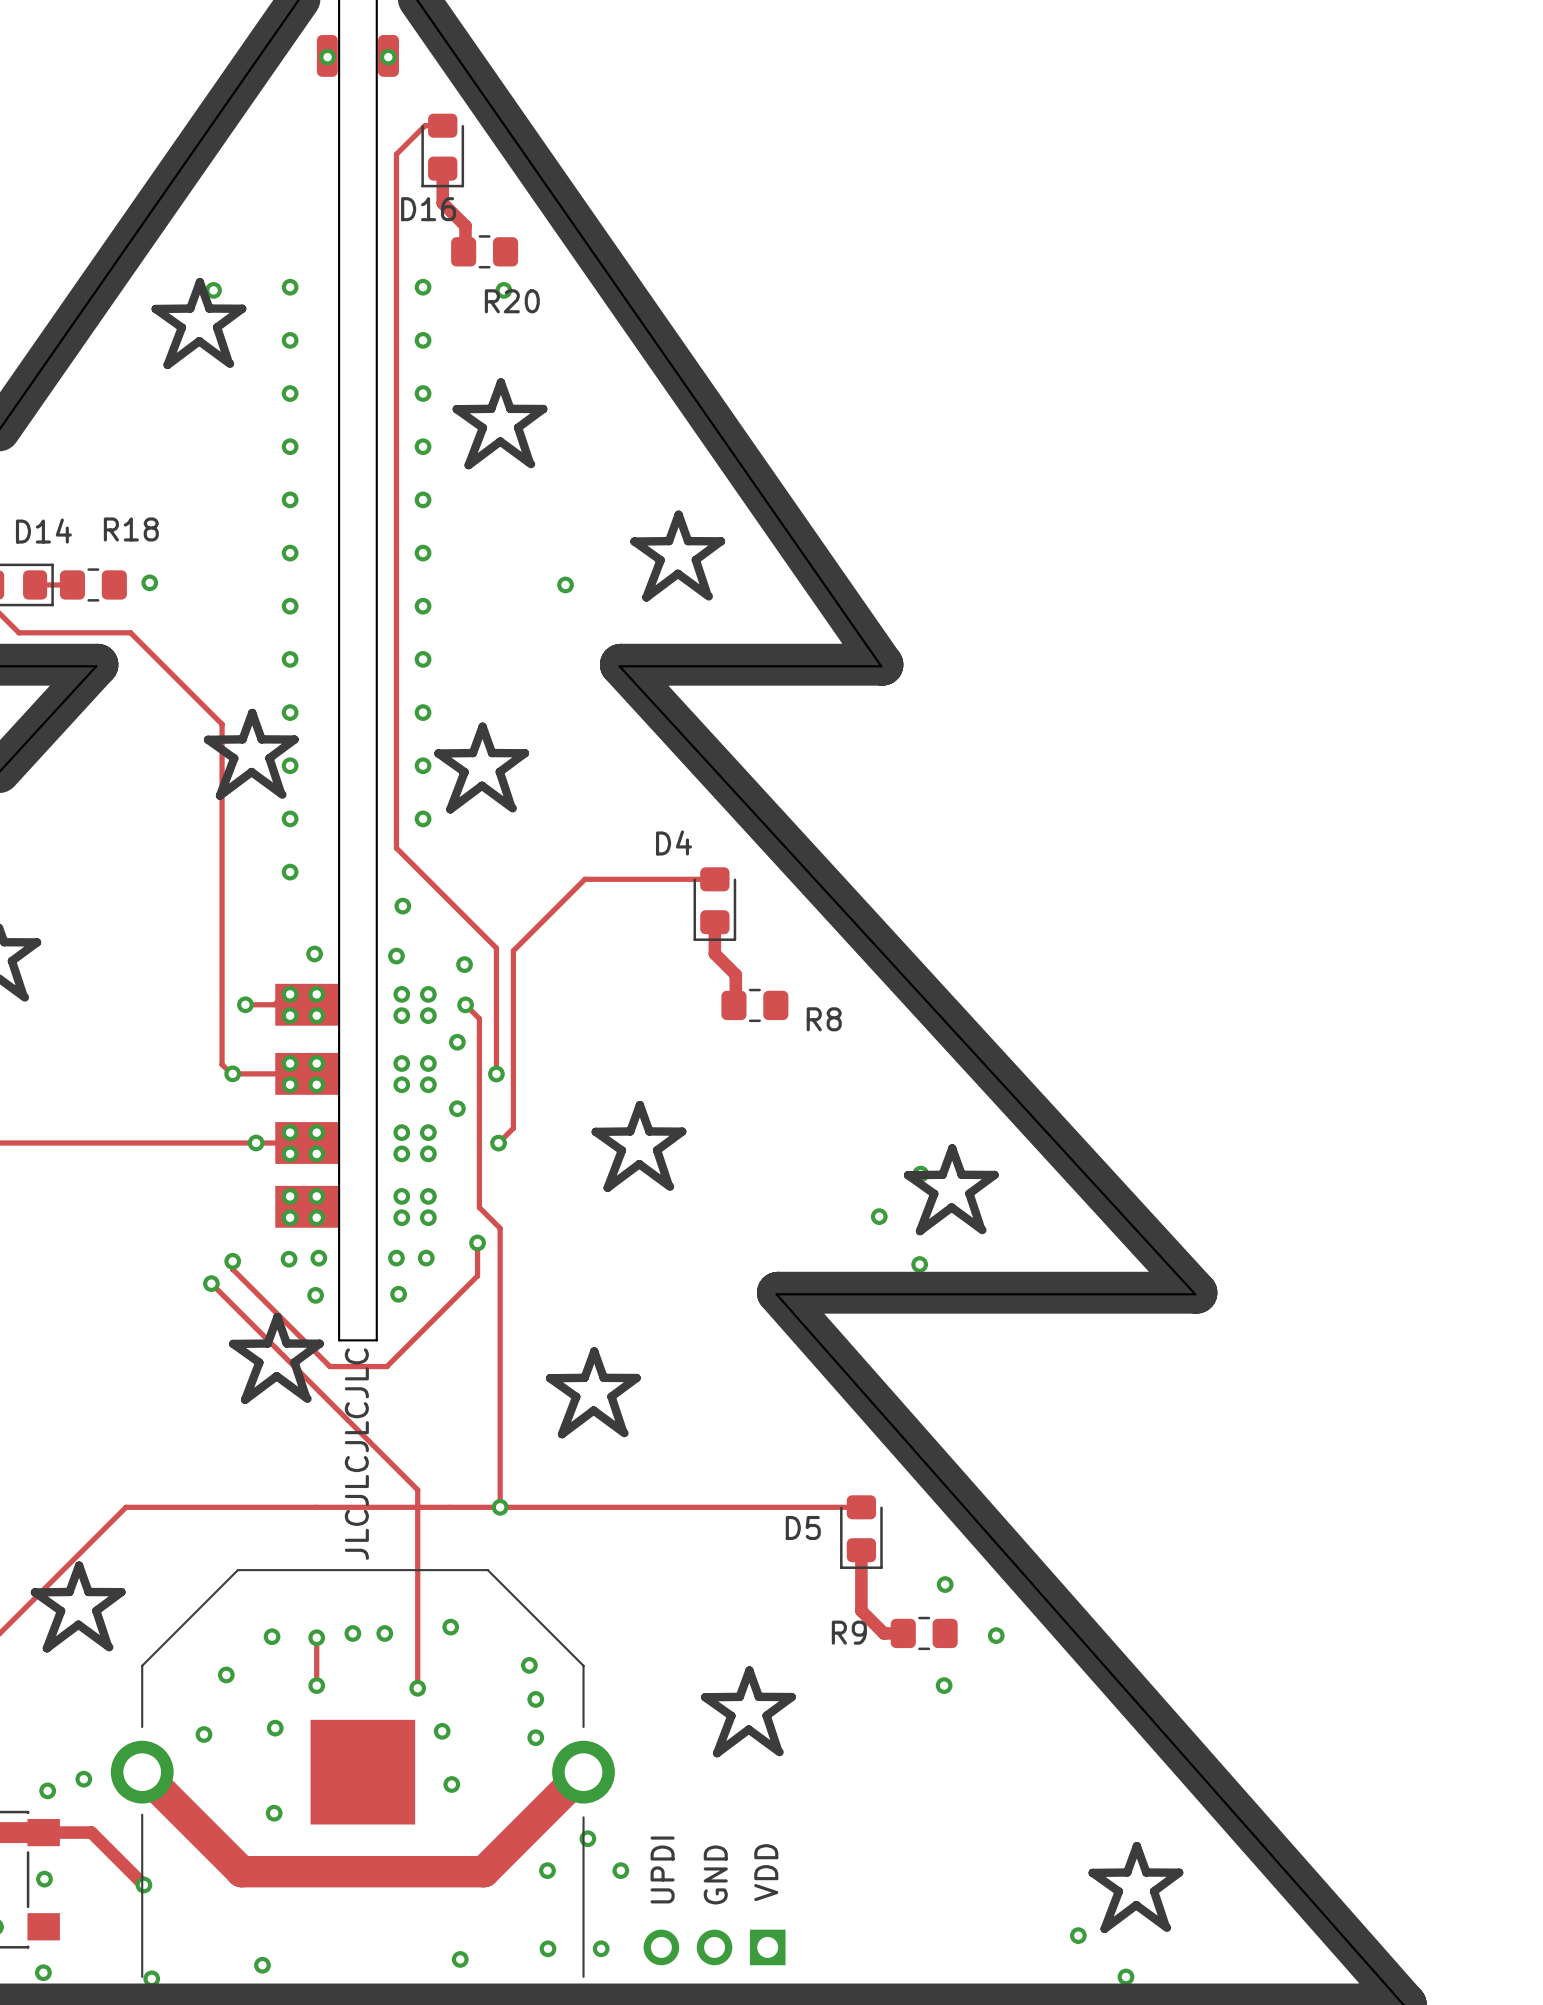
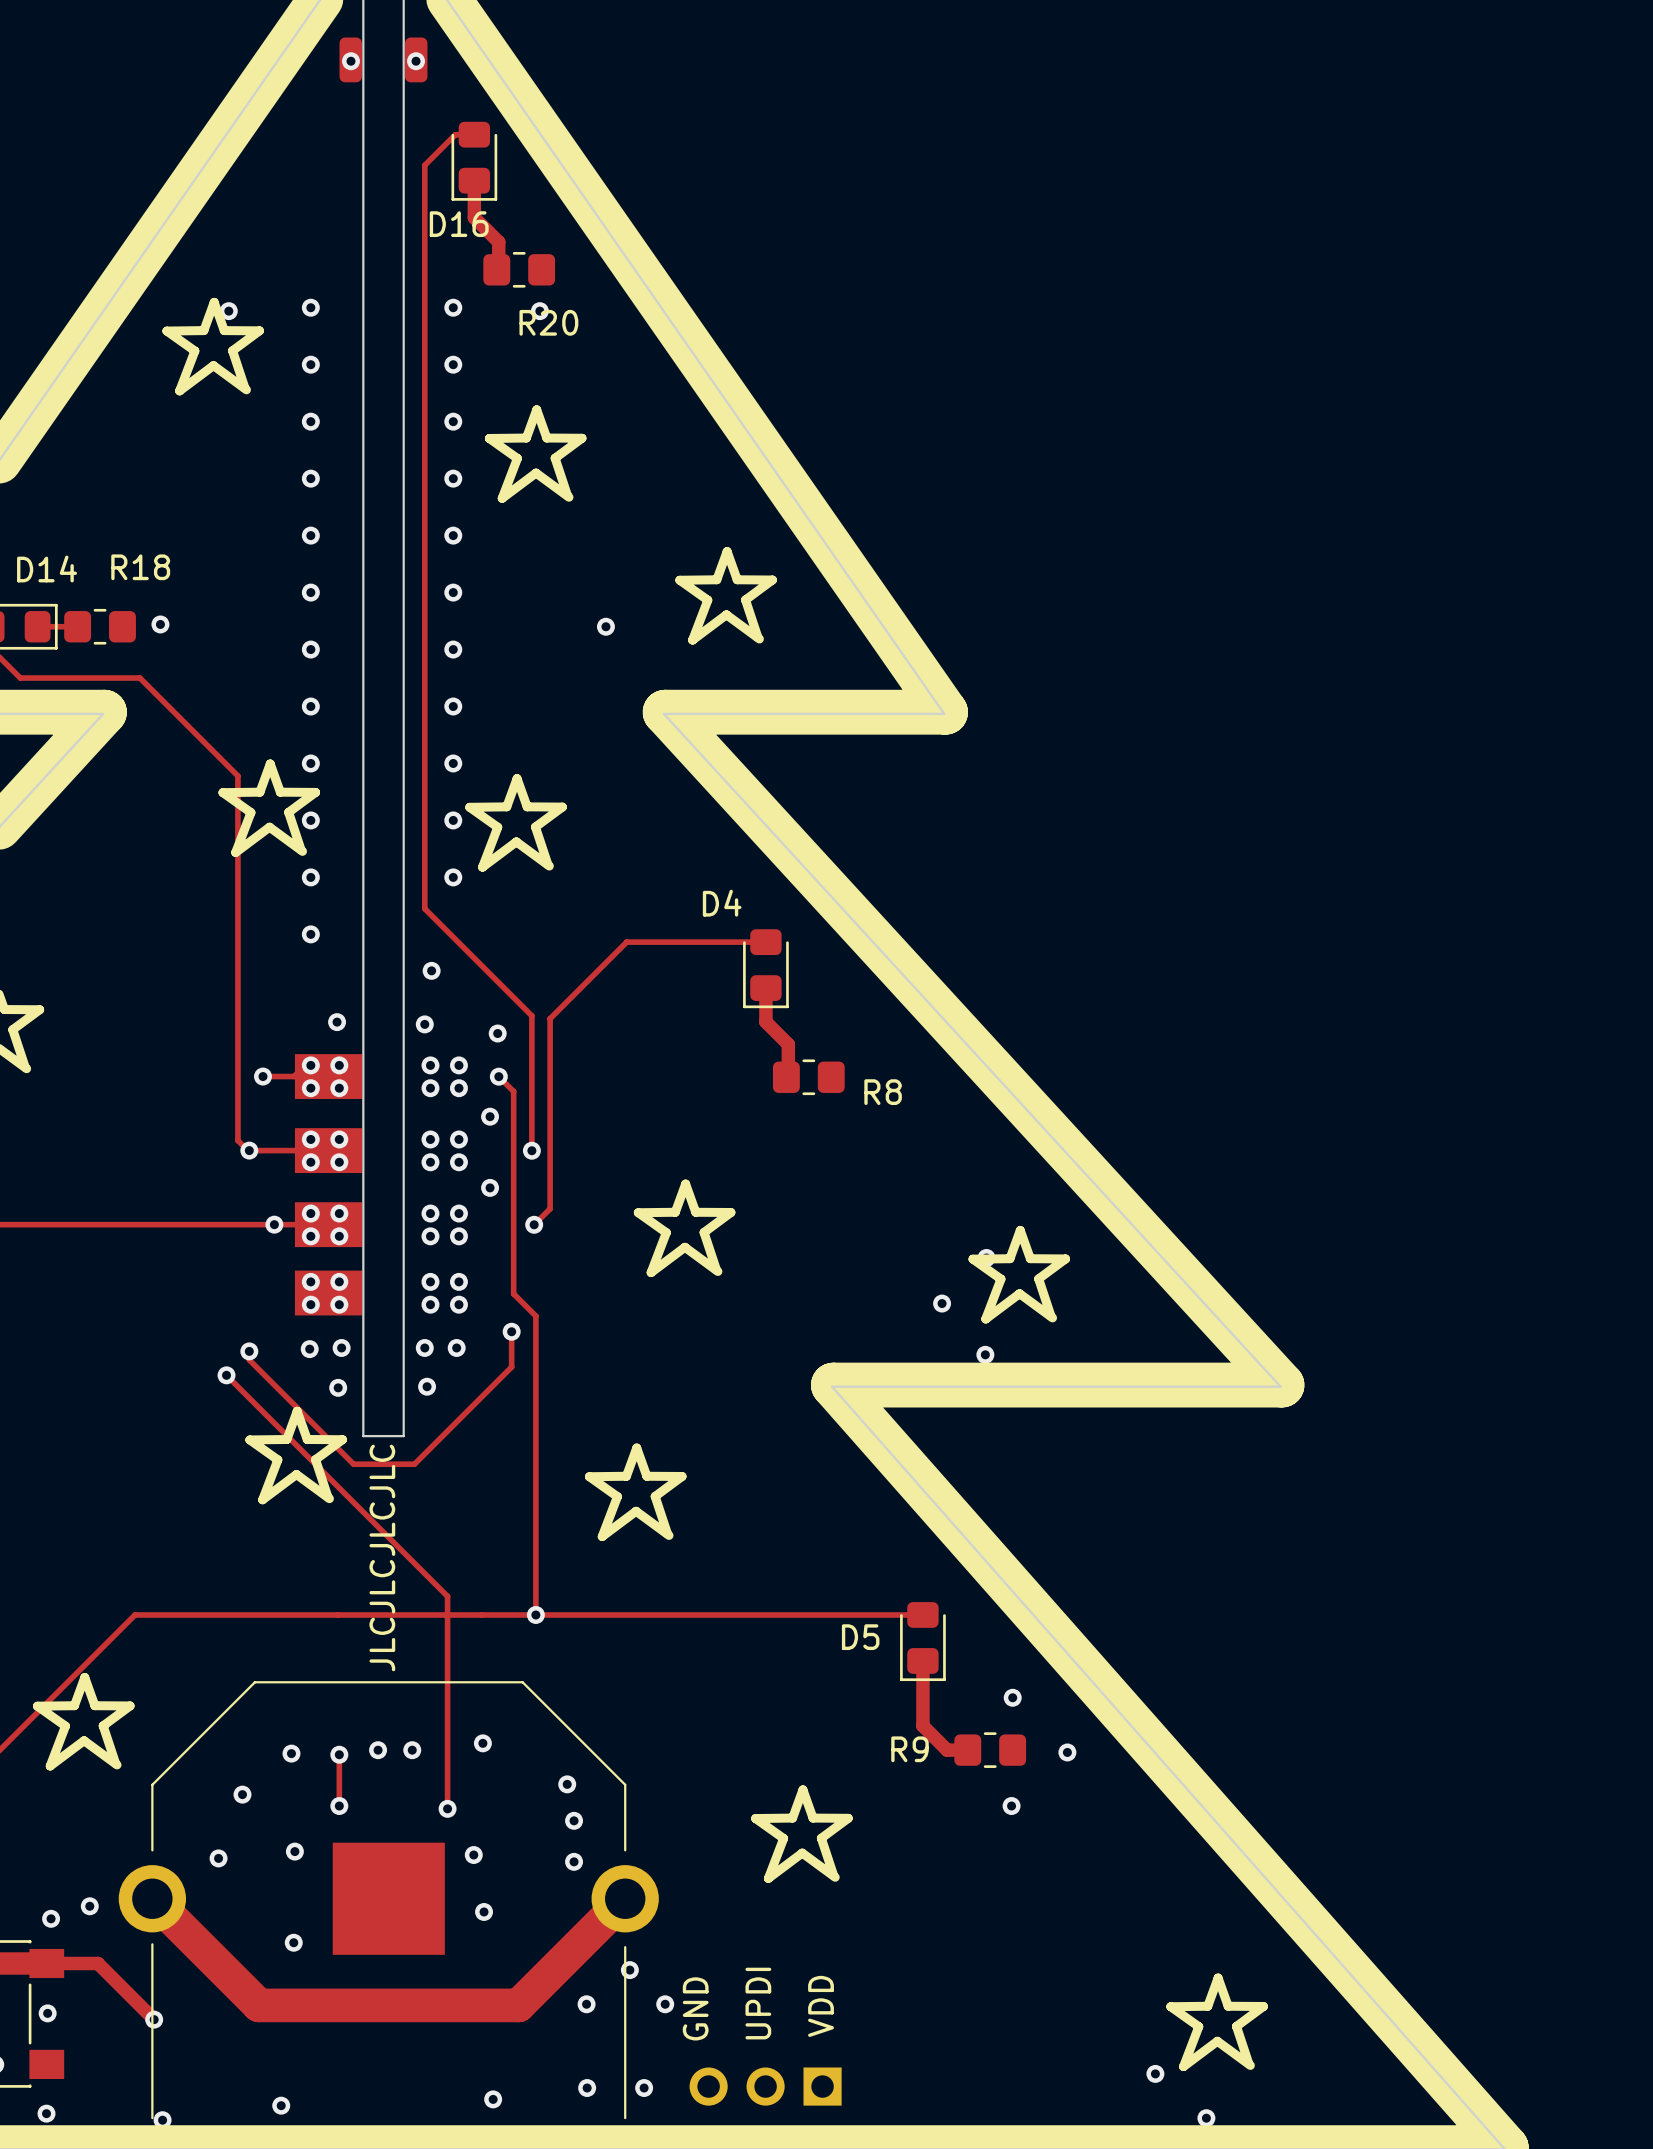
text position: UPDI (662, 1869) -> UPDI (758, 2003)
text position: GND (715, 1874) -> GND (695, 2008)

